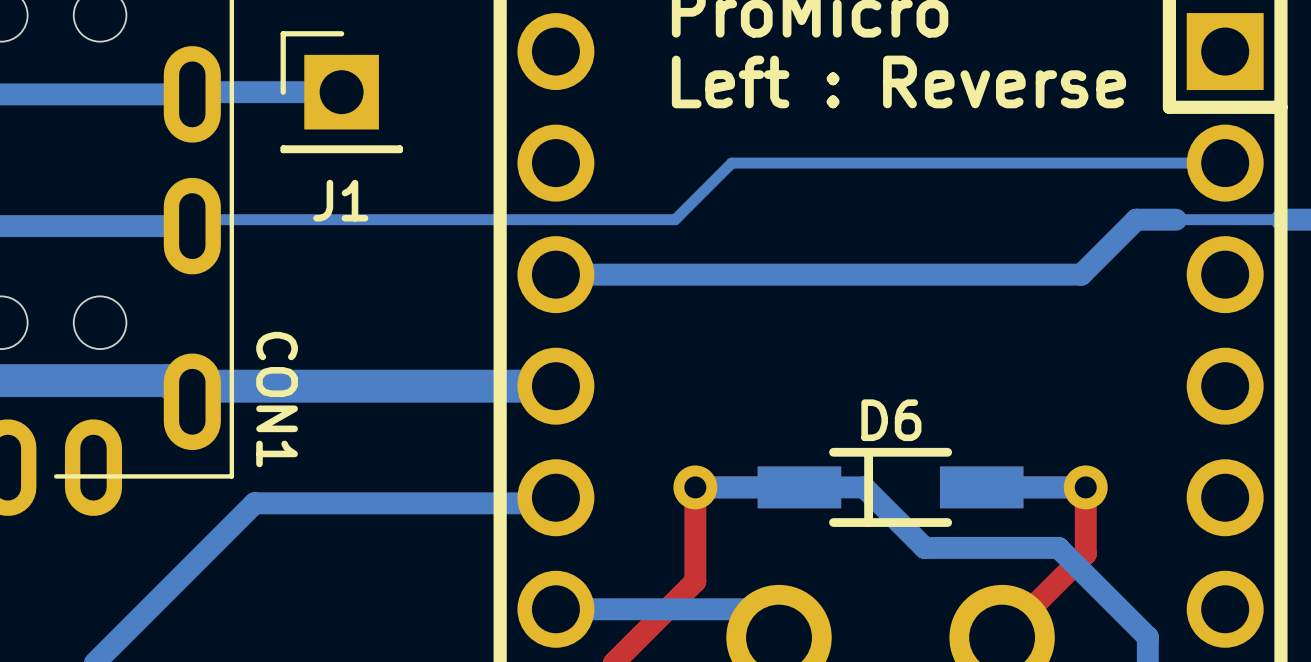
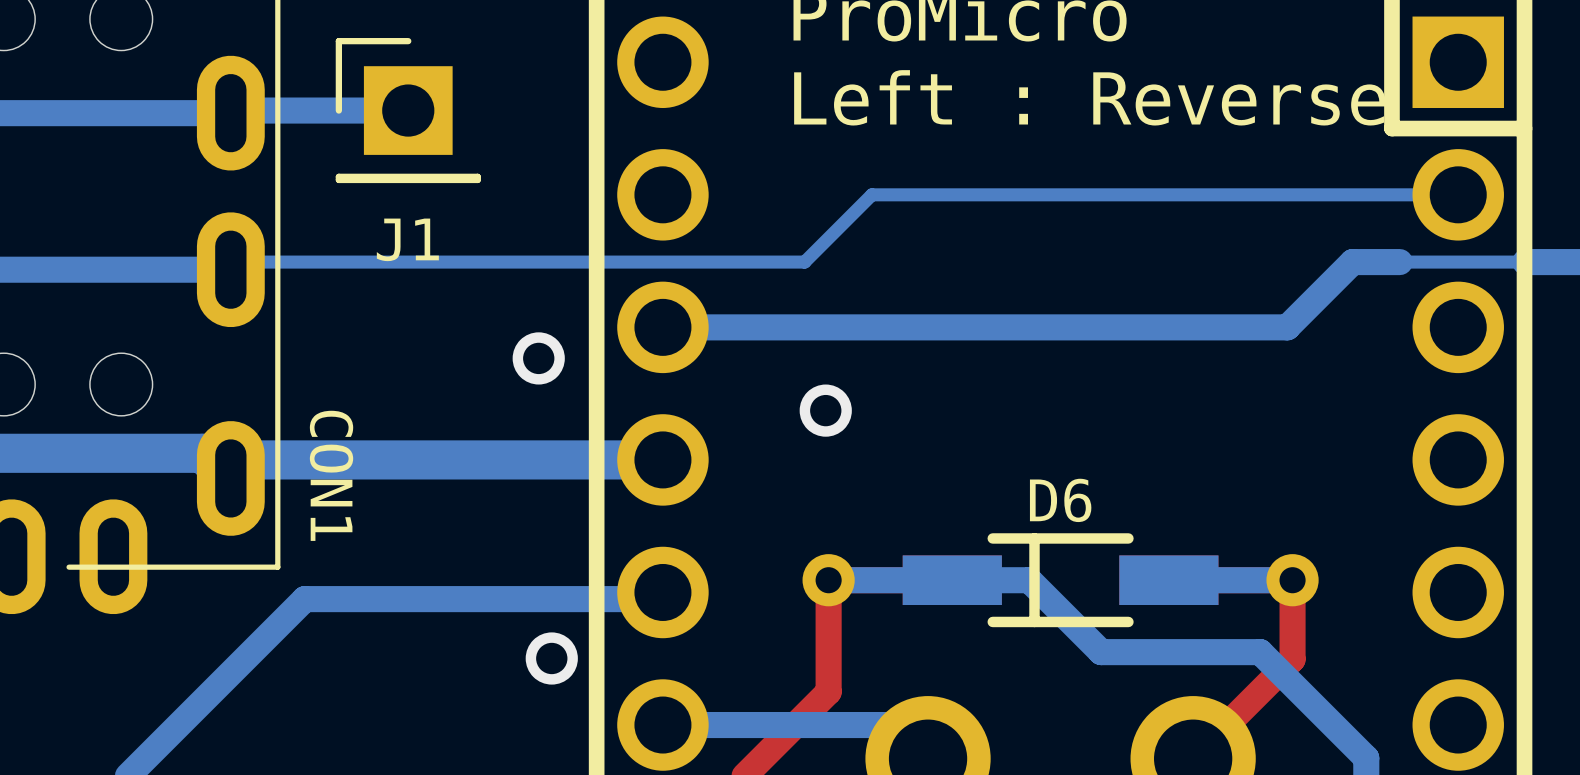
via: none -> (538, 358)
via: none -> (825, 410)
via: none -> (551, 658)

